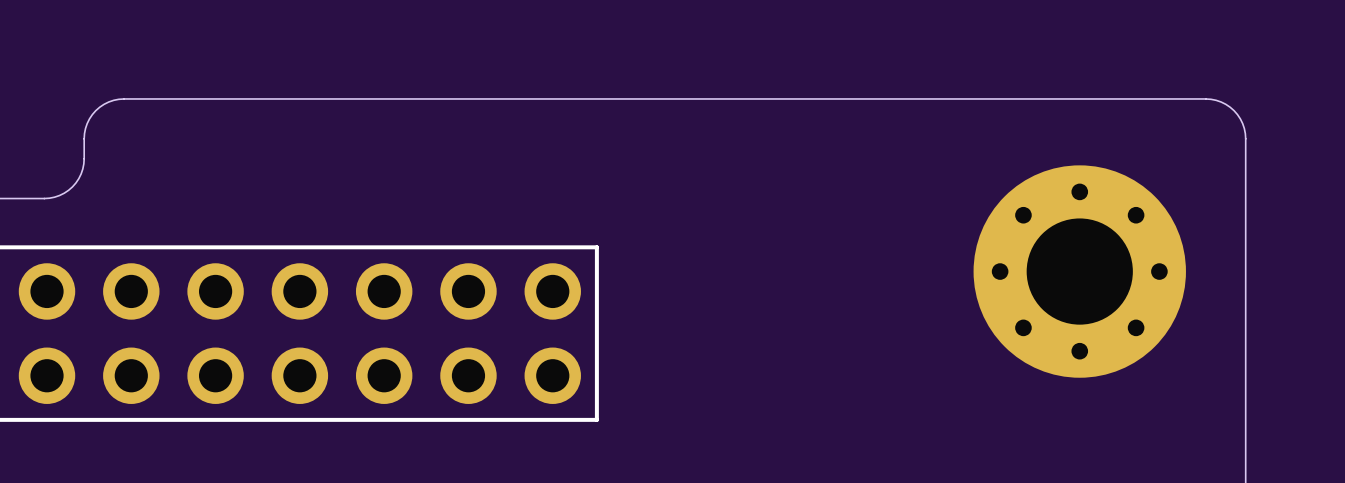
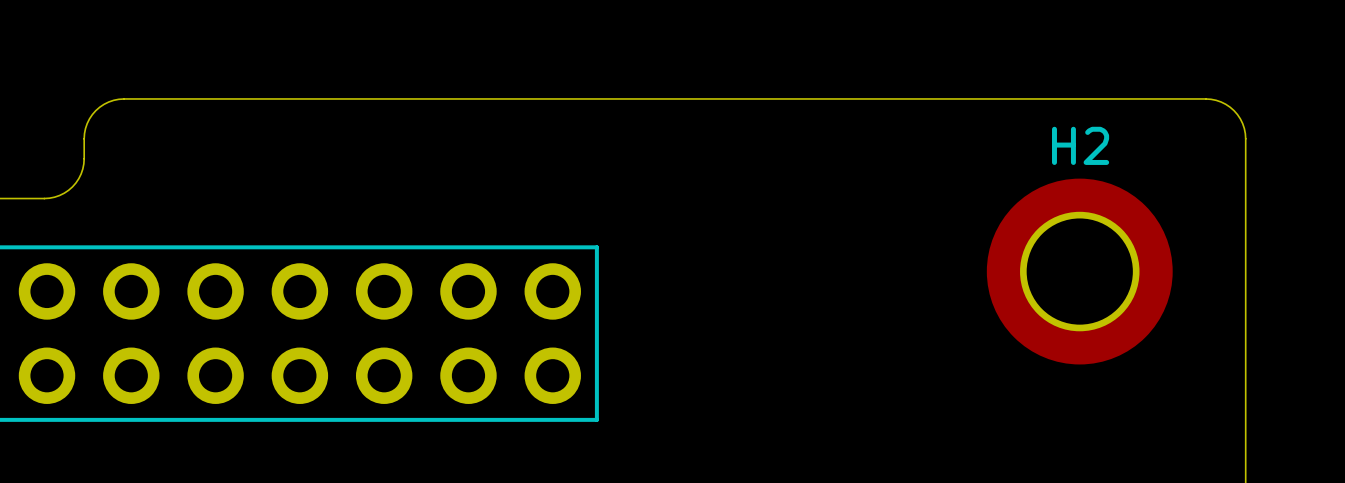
part: (1079, 271) -> none
H2: none -> (1079, 271)

